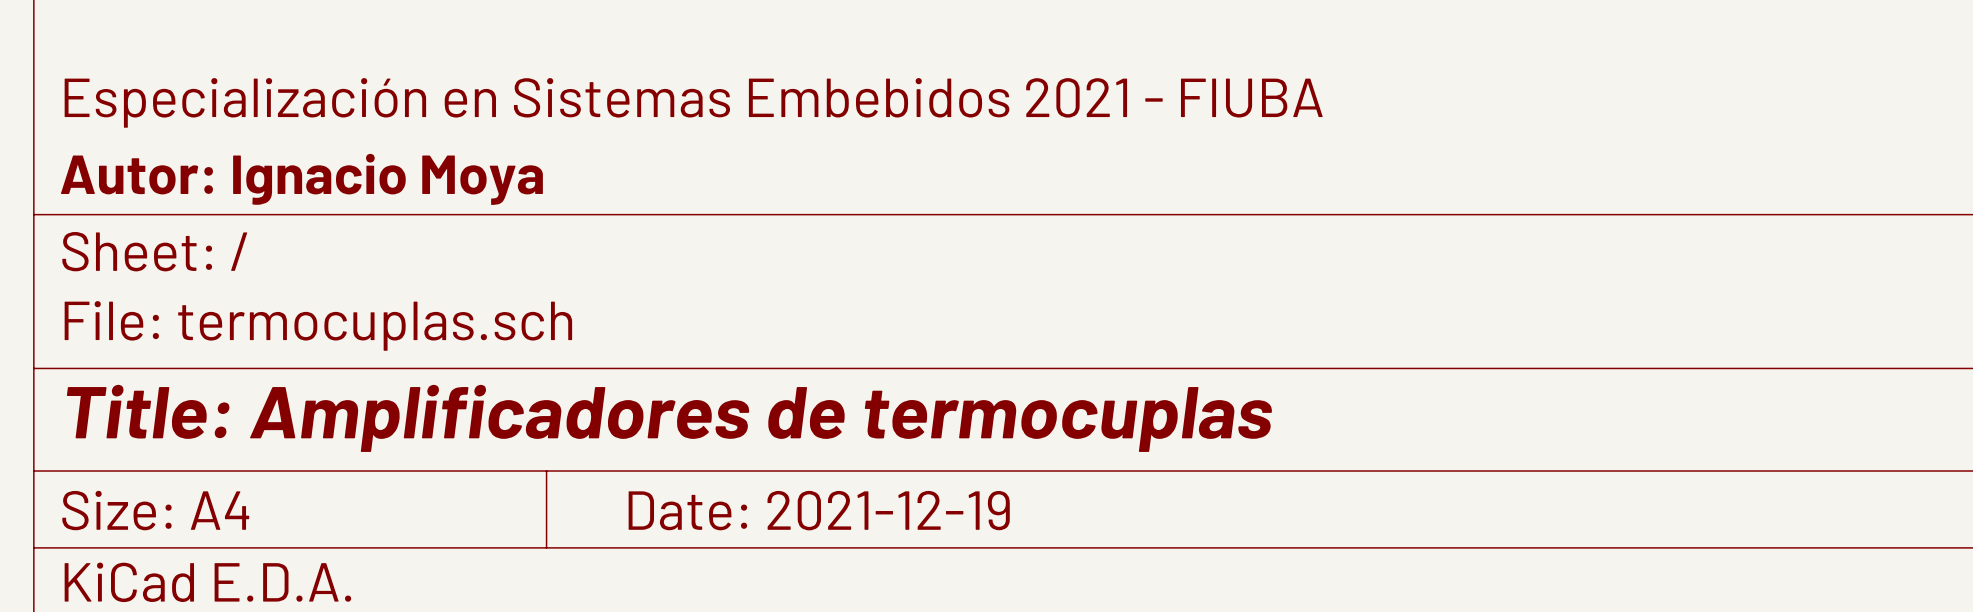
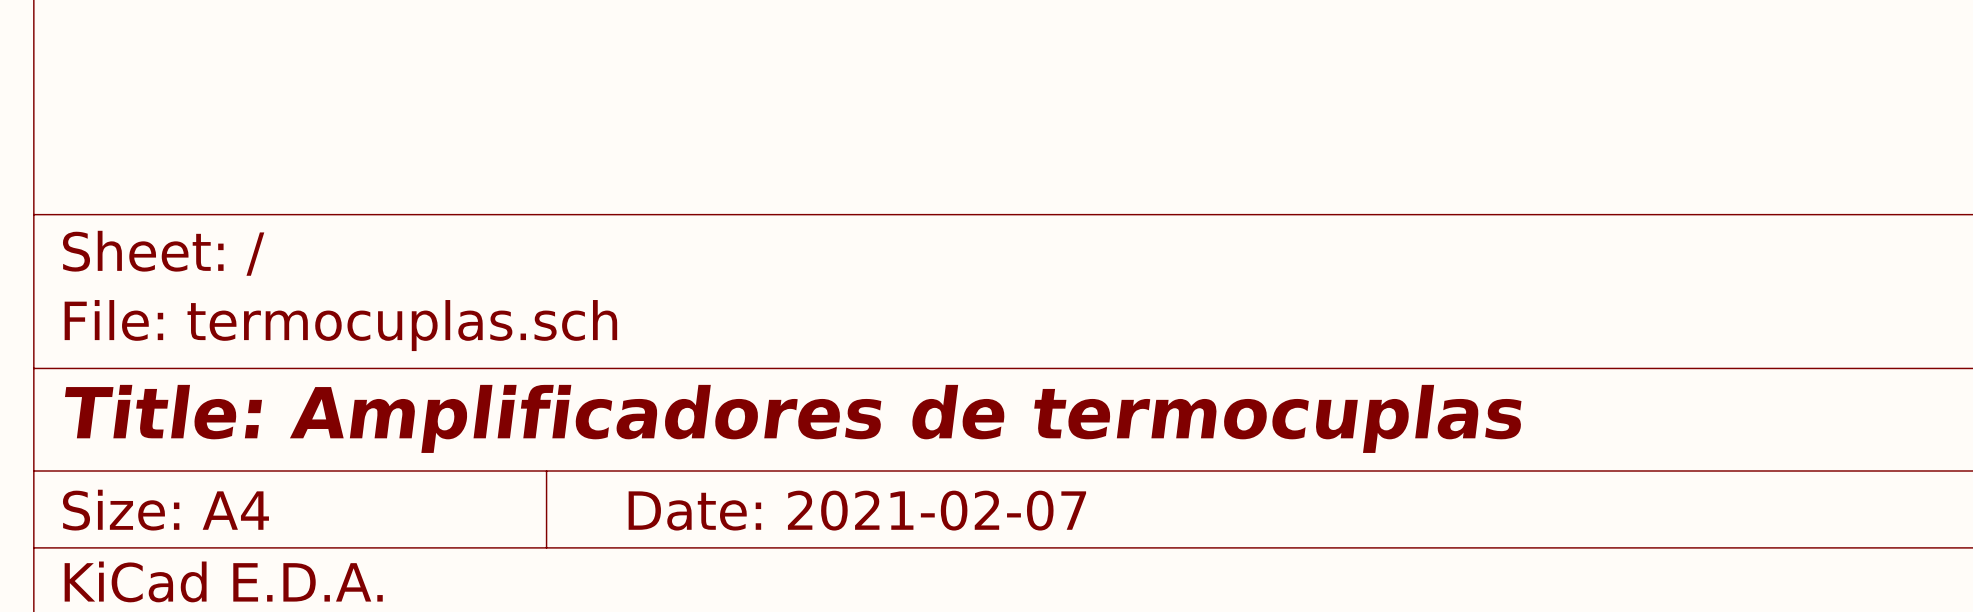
title block: Especialización en Sistemas Embebidos 2021 - FIUBA (693, 102) -> none
title block: Autor: Ignacio Moya (301, 179) -> none
title block: Date: 2021-12-19 (819, 510) -> Date: 2021-02-07 (857, 510)

